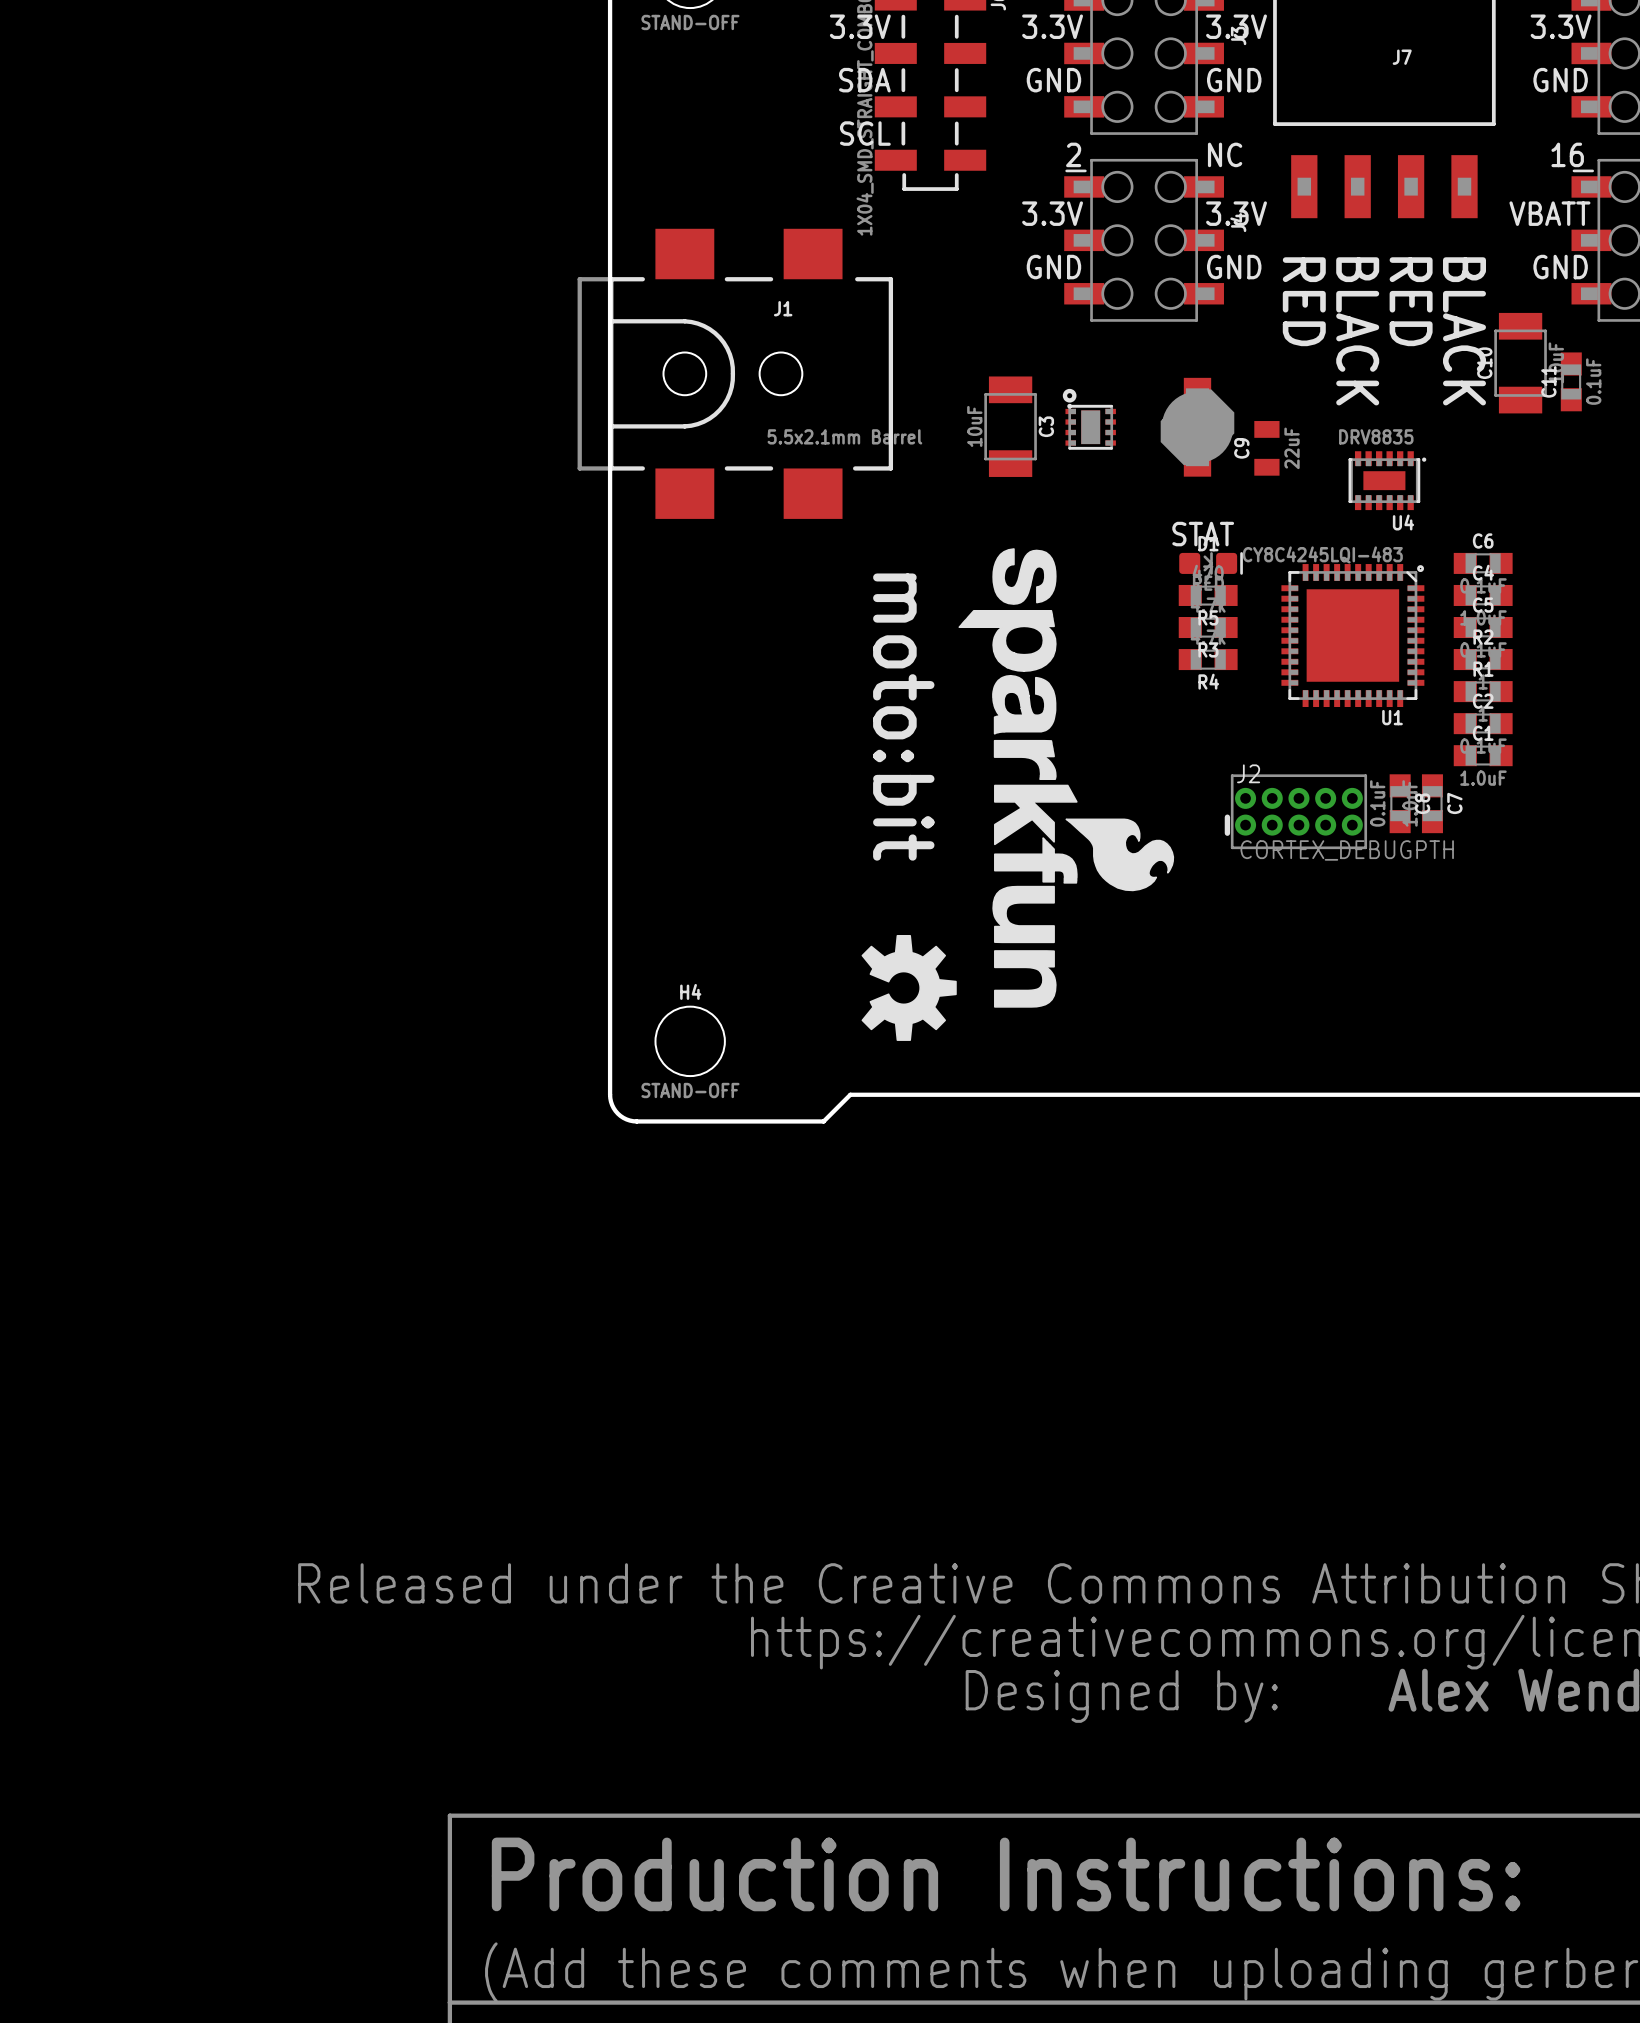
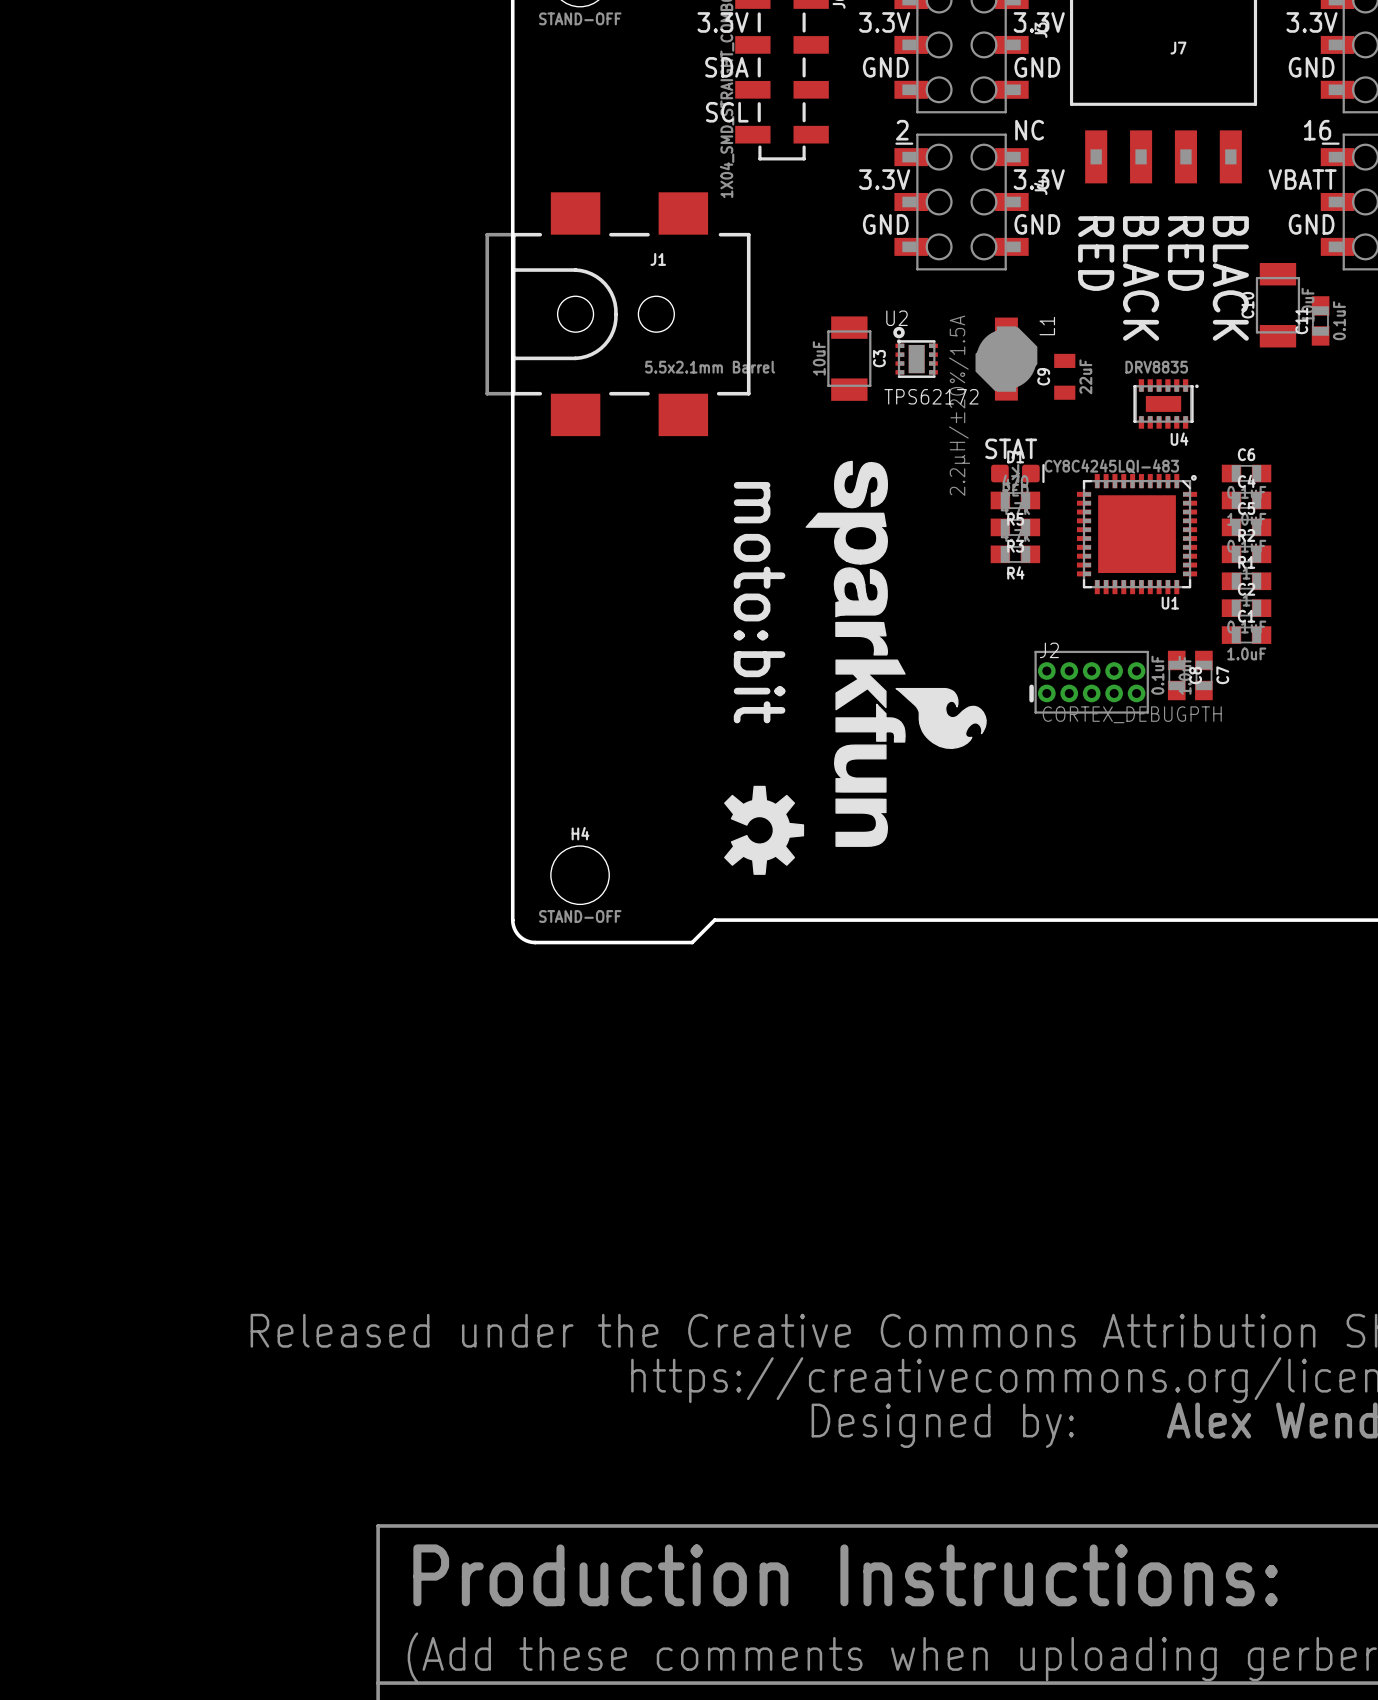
U2 name: none -> U2 (896, 318)
L1 name: none -> L1 (1047, 326)
U2 value: none -> TPS62172 (931, 396)
L1 value: none -> 2.2µH/±20%/1.5A (959, 405)

